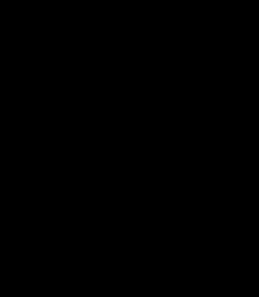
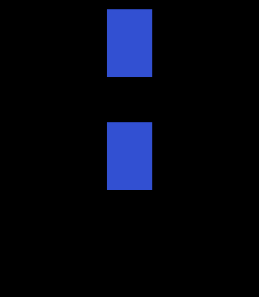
part: none -> (129, 99)

